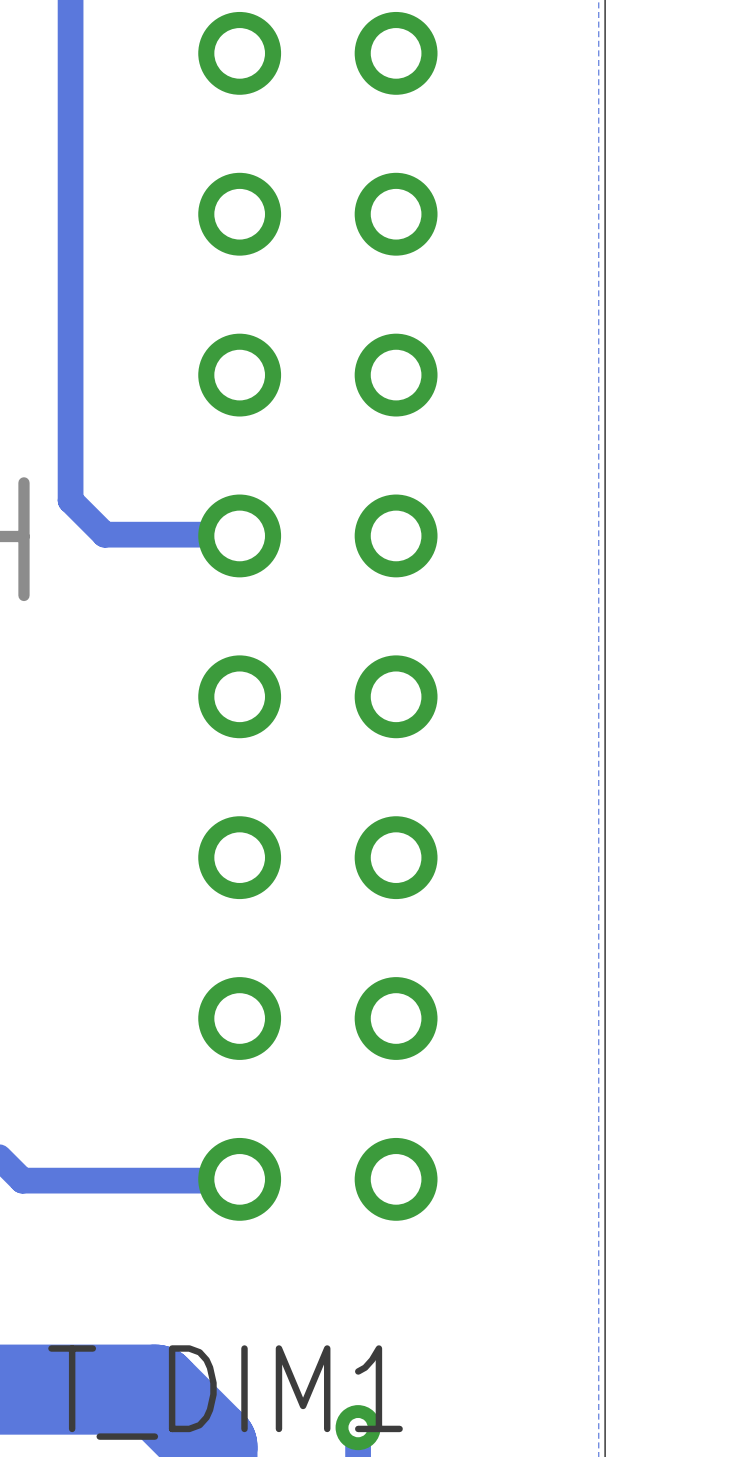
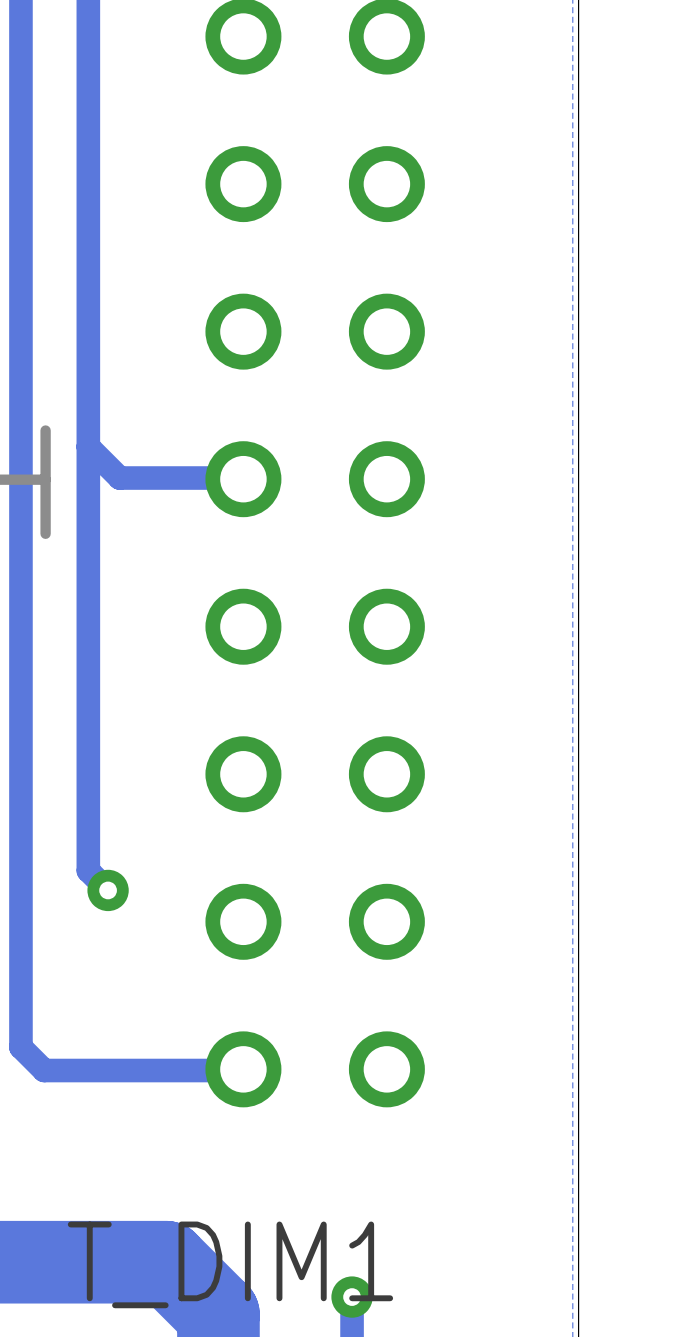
track: none -> (88, 446) (88, 870) (108, 890)
via: none -> (108, 890)

